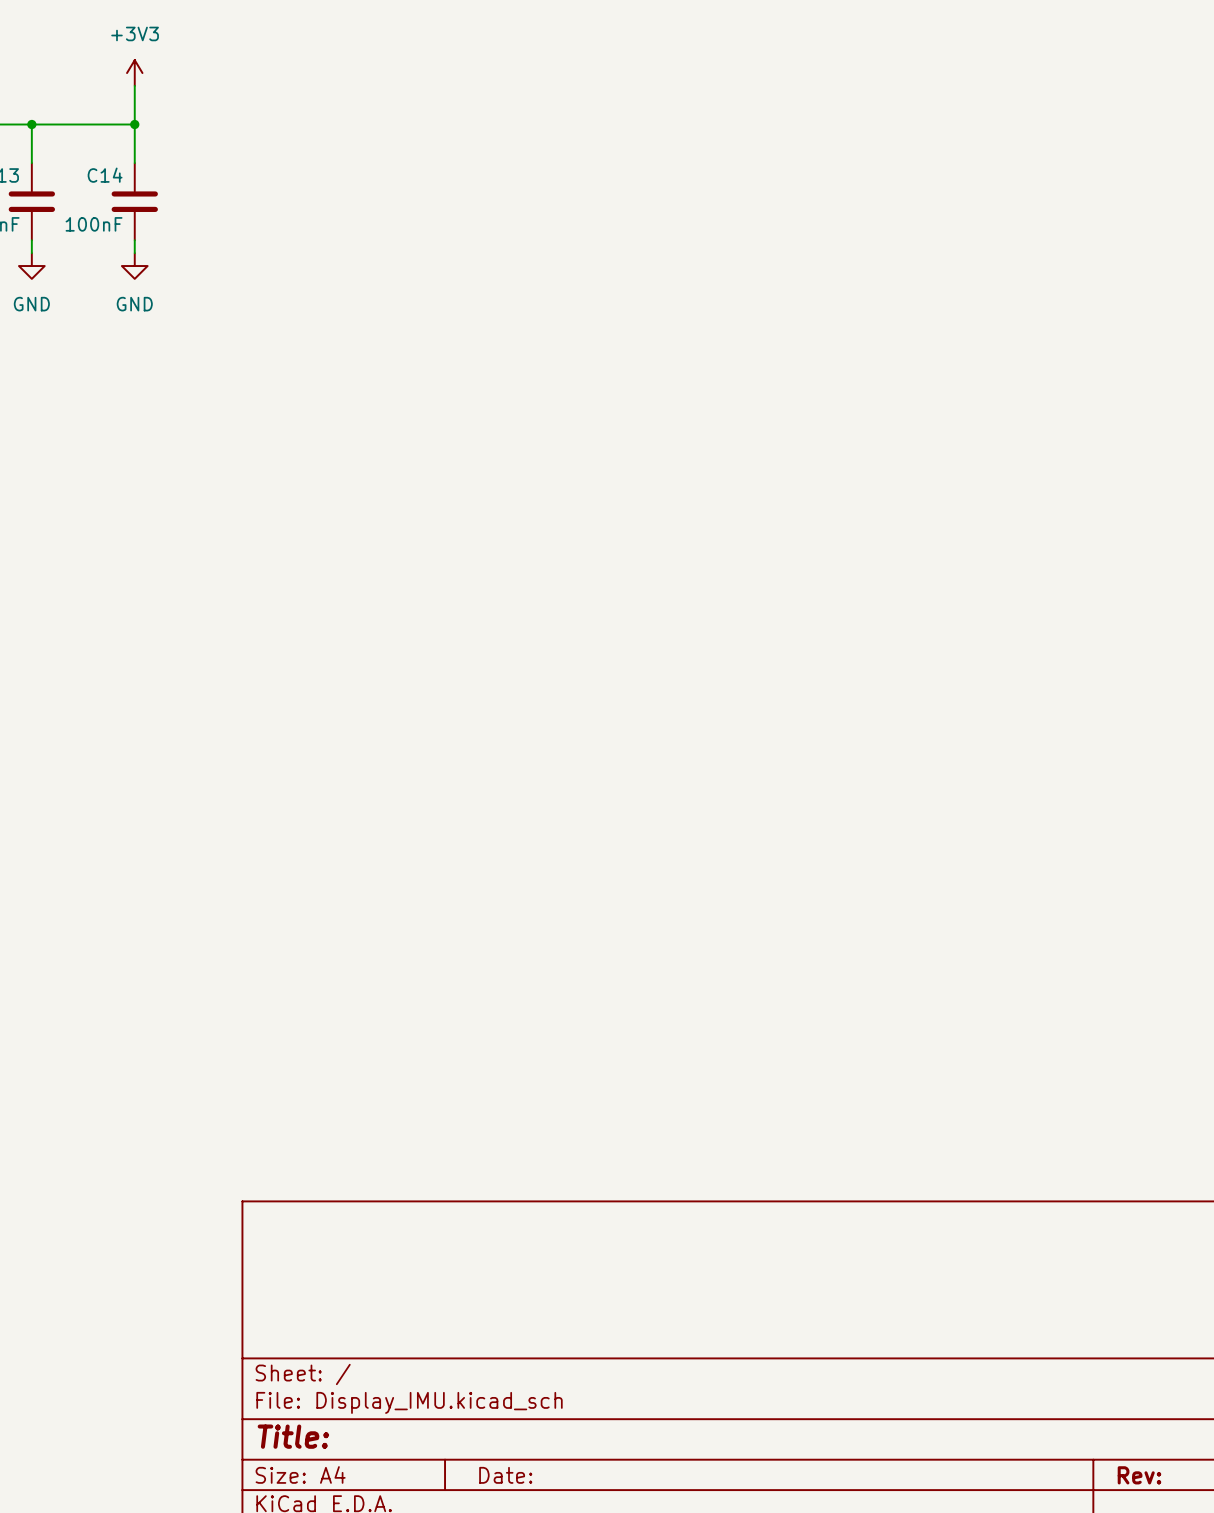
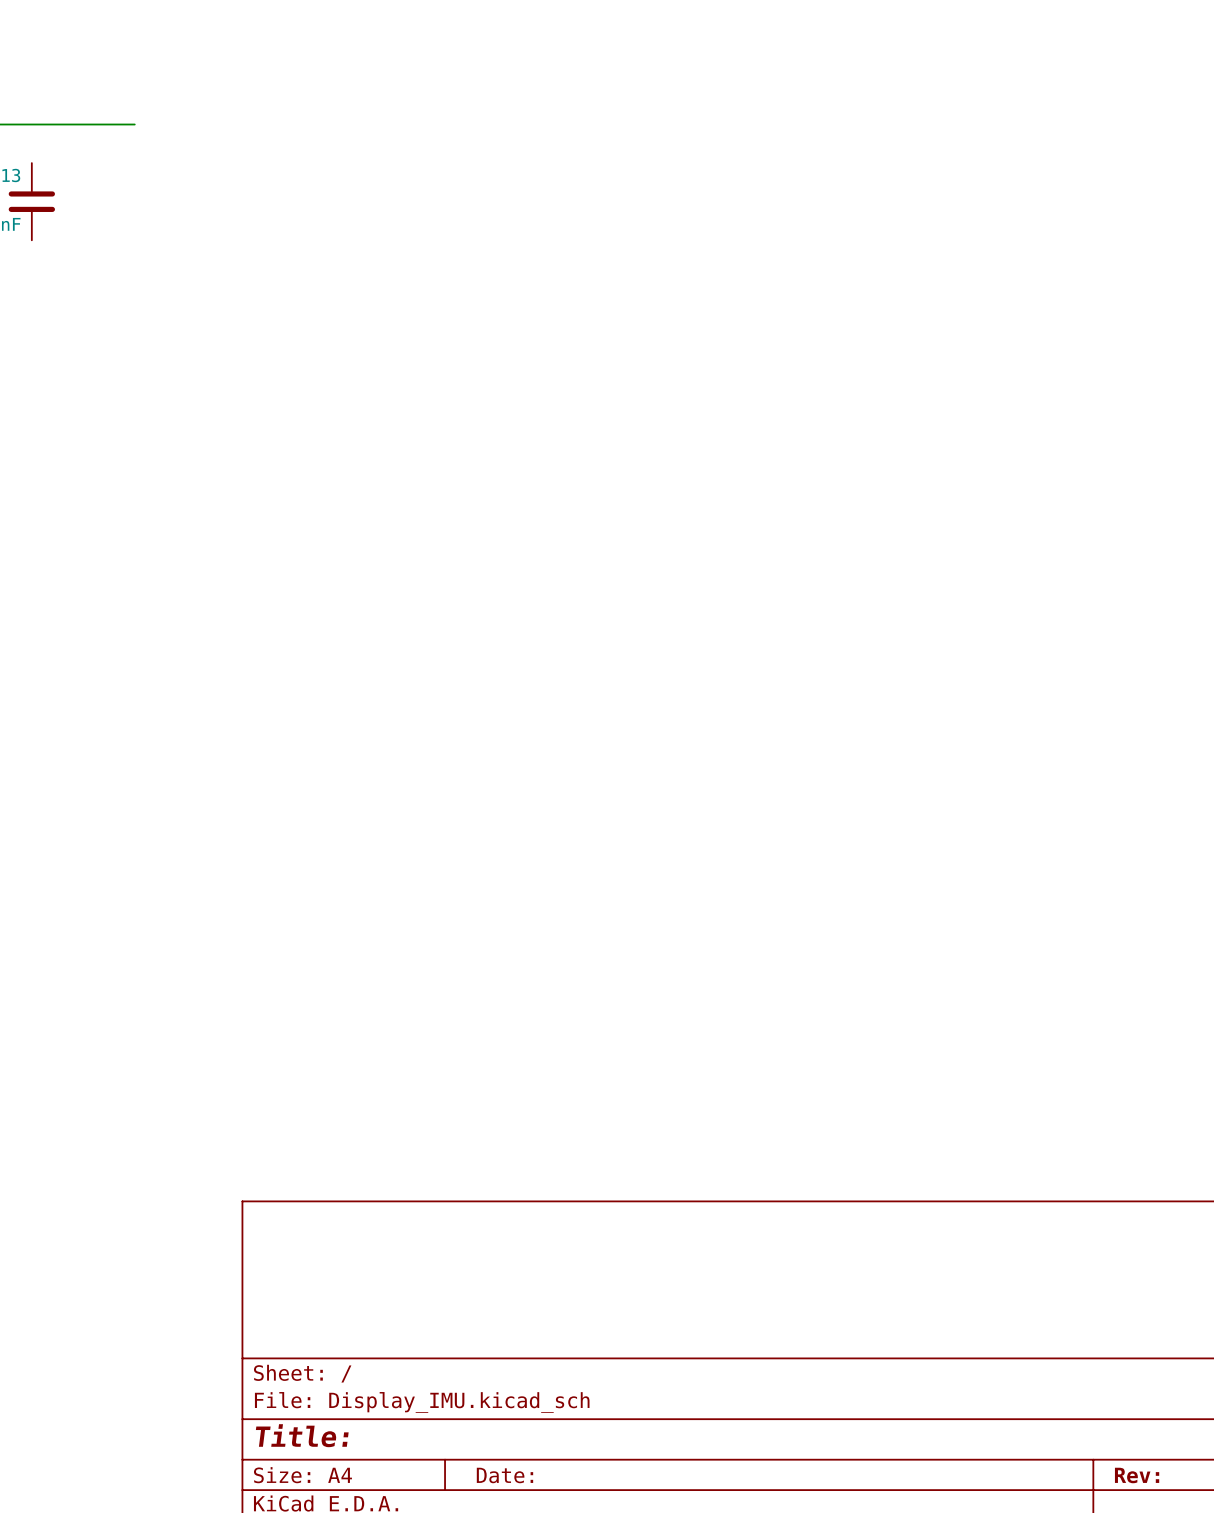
power symbol: +3V3 (134, 73) -> none
wire: (134, 85) (134, 163) -> none
wire: (31, 124) (31, 163) -> none
junction: (31, 124) -> none
junction: (134, 124) -> none
C14: 100nF (134, 201) -> none
wire: (31, 240) (31, 253) -> none
wire: (134, 240) (134, 253) -> none
power symbol: GND (31, 266) -> none
power symbol: GND (134, 266) -> none

